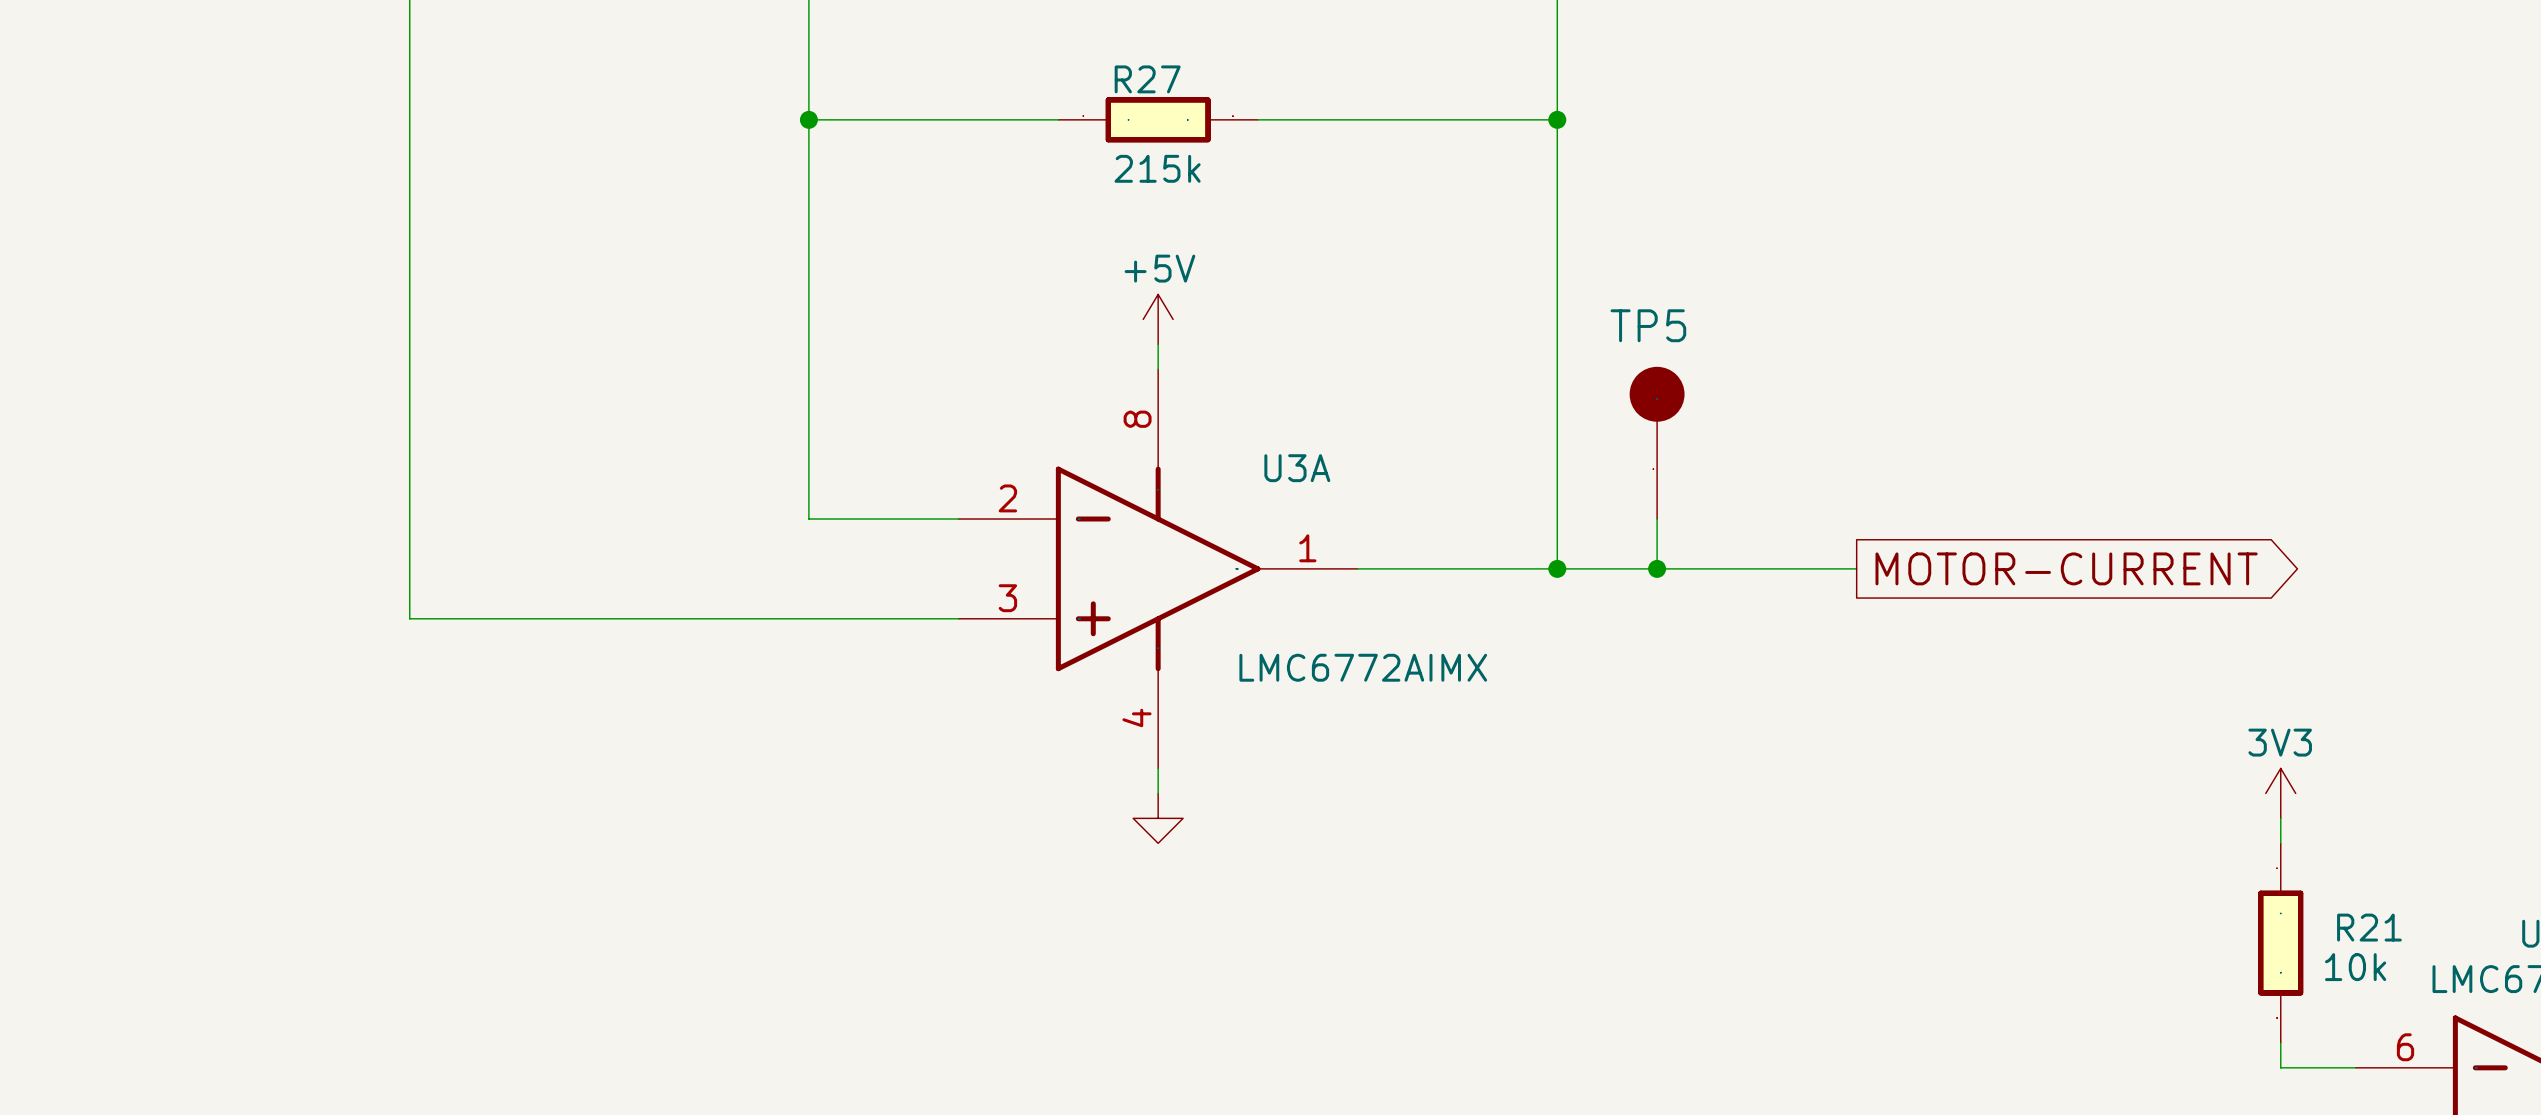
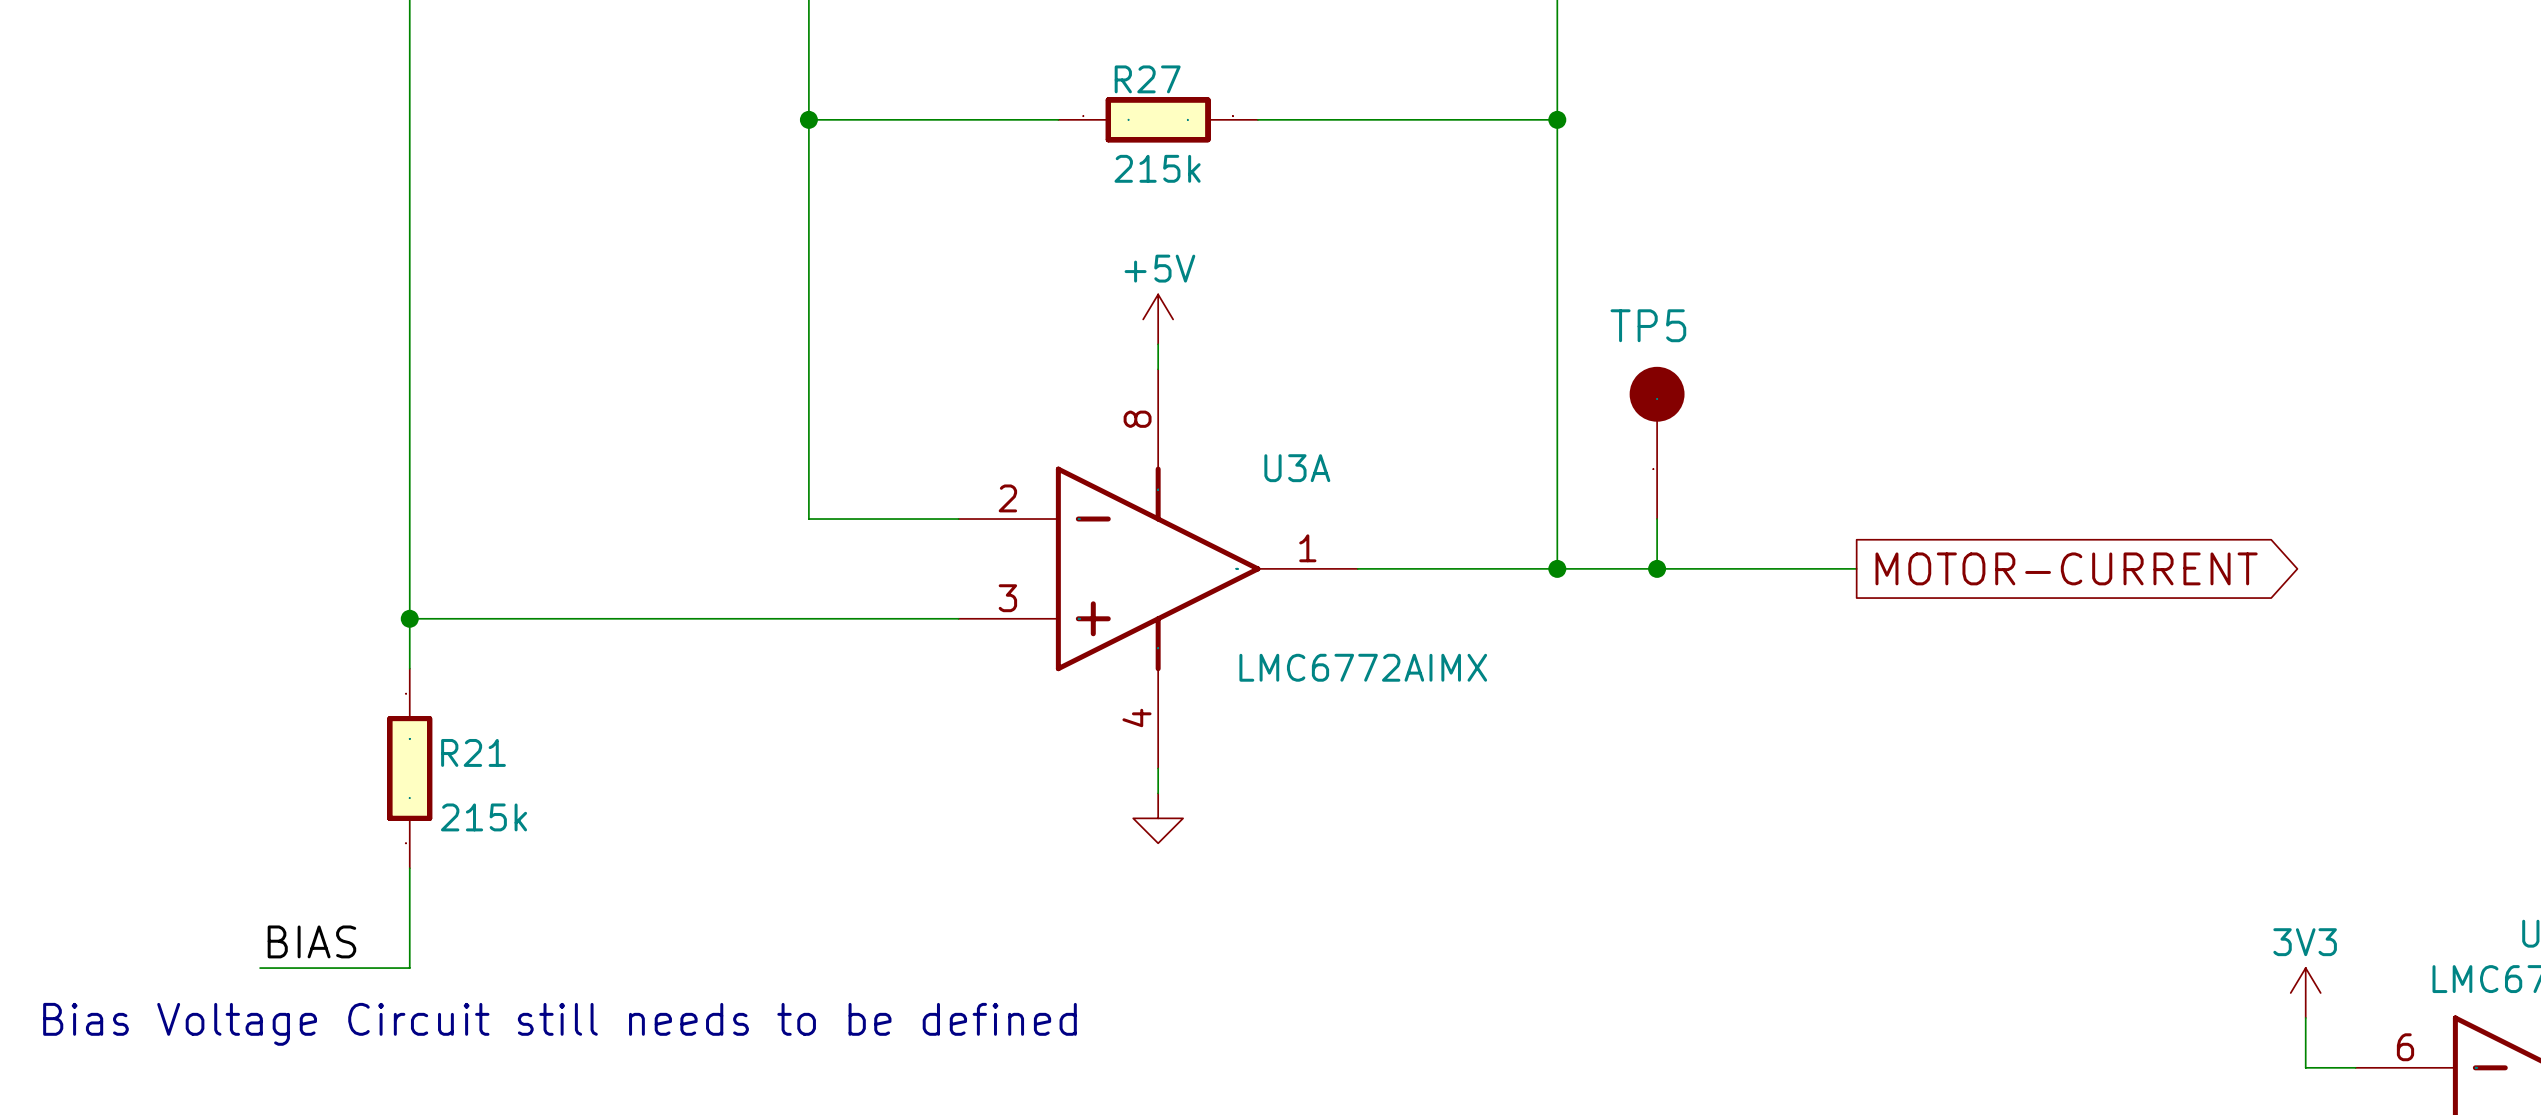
wire: none -> (409, 618) (409, 668)
junction: none -> (409, 618)
power symbol position: 3V3 (2280, 793) -> 3V3 (2305, 992)
wire: (2280, 818) (2280, 843) -> none
wire: none -> (409, 868) (409, 968) (260, 968)
label: none -> BIAS (311, 941)
R21 rotation: 0° (2280, 943) -> 180° (409, 768)
R21 position: (2280, 943) -> (409, 768)
R21 text: 10k (2355, 967) -> 215k (484, 817)
text: none -> Bias Voltage Circuit still needs to be defined (559, 1024)
wire: (2280, 1042) (2280, 1067) (2305, 1067) -> (2305, 1017) (2305, 1067)

